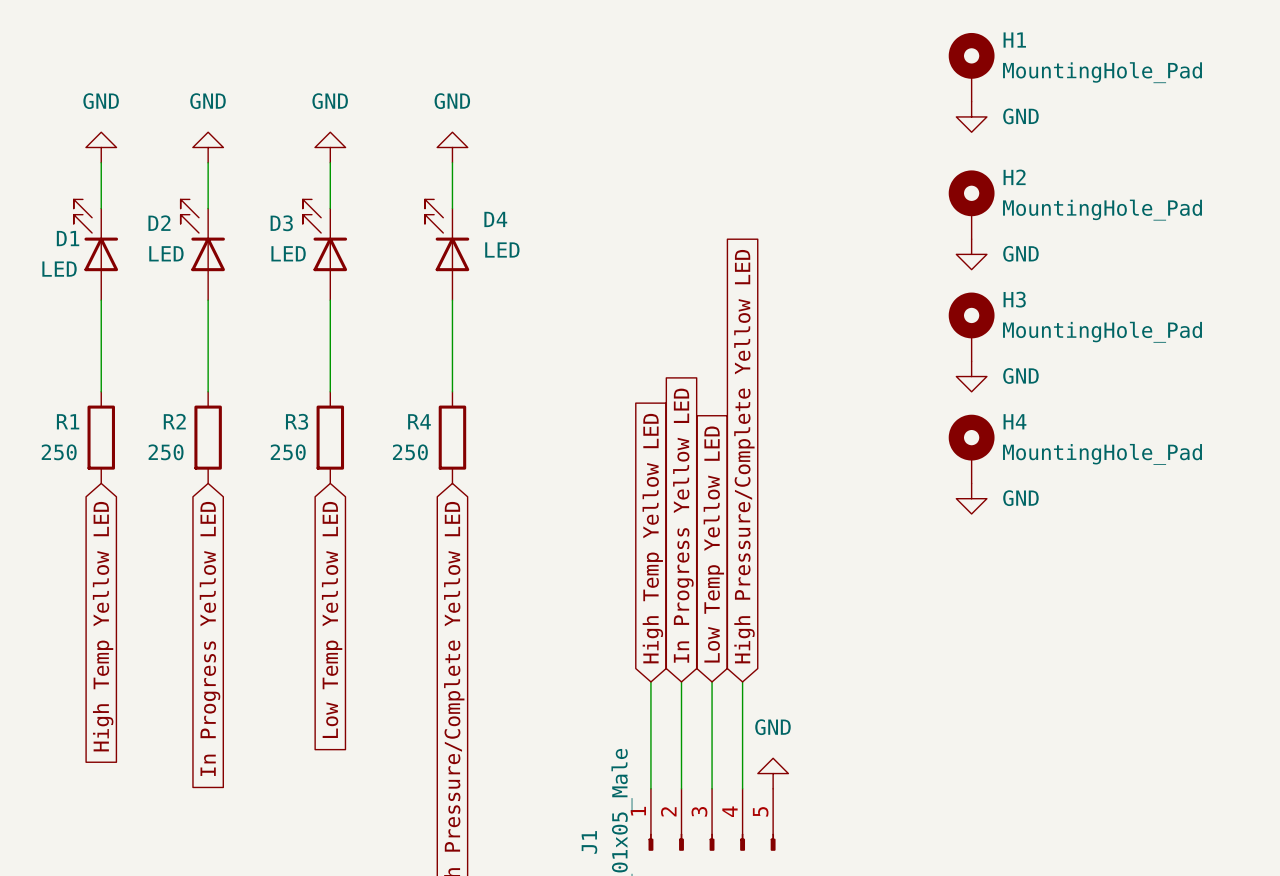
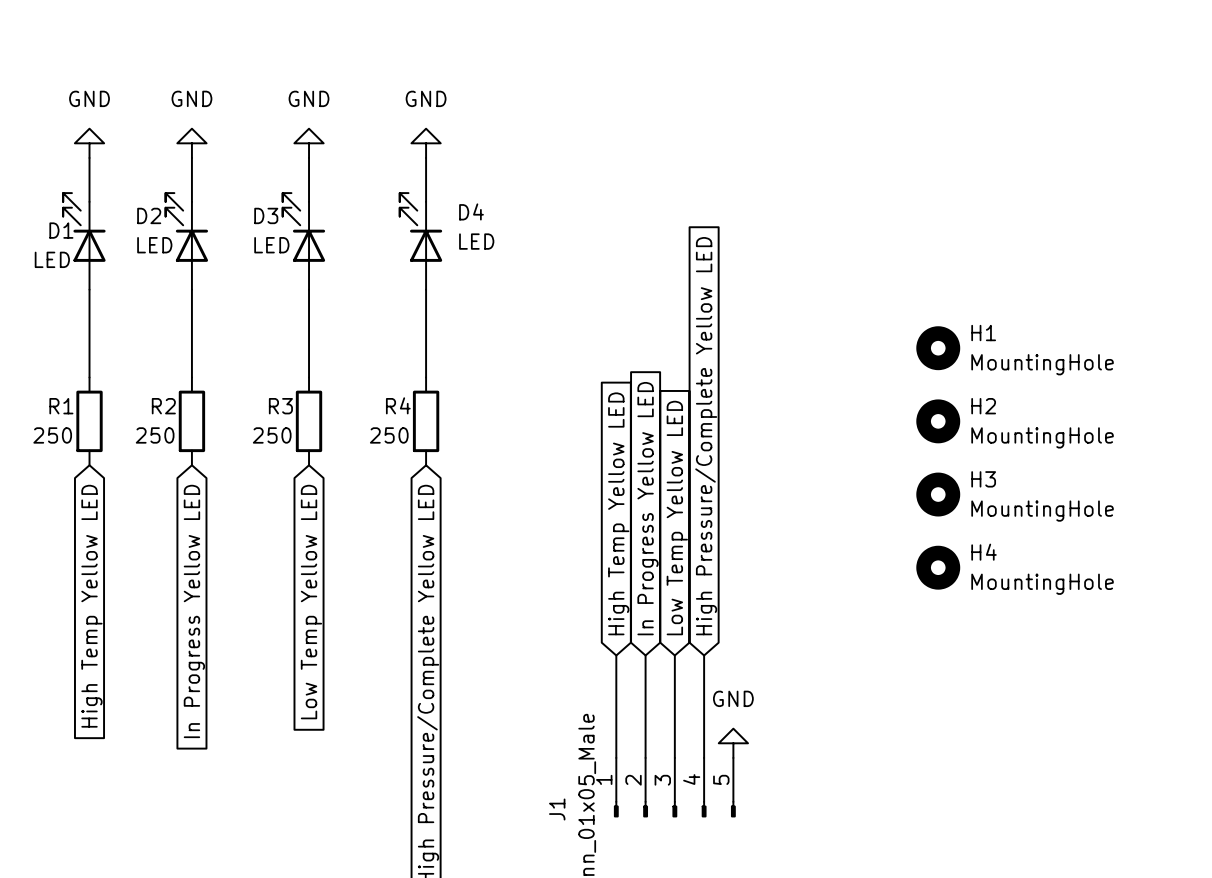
H1 symbol: [948, 32, 995, 102] -> [916, 326, 961, 371]
H1 value: MountingHole_Pad (1102, 72) -> MountingHole (1042, 364)
power symbol: GND (971, 116) -> none
H2 symbol: [948, 170, 995, 240] -> [916, 399, 961, 444]
H2 value: MountingHole_Pad (1102, 210) -> MountingHole (1042, 437)
power symbol: GND (971, 254) -> none
H3 symbol: [948, 292, 995, 362] -> [916, 472, 961, 517]
H3 value: MountingHole_Pad (1102, 332) -> MountingHole (1042, 511)
power symbol: GND (971, 376) -> none
H4 symbol: [948, 414, 995, 484] -> [916, 545, 961, 590]
H4 value: MountingHole_Pad (1102, 454) -> MountingHole (1042, 584)
power symbol: GND (971, 498) -> none

